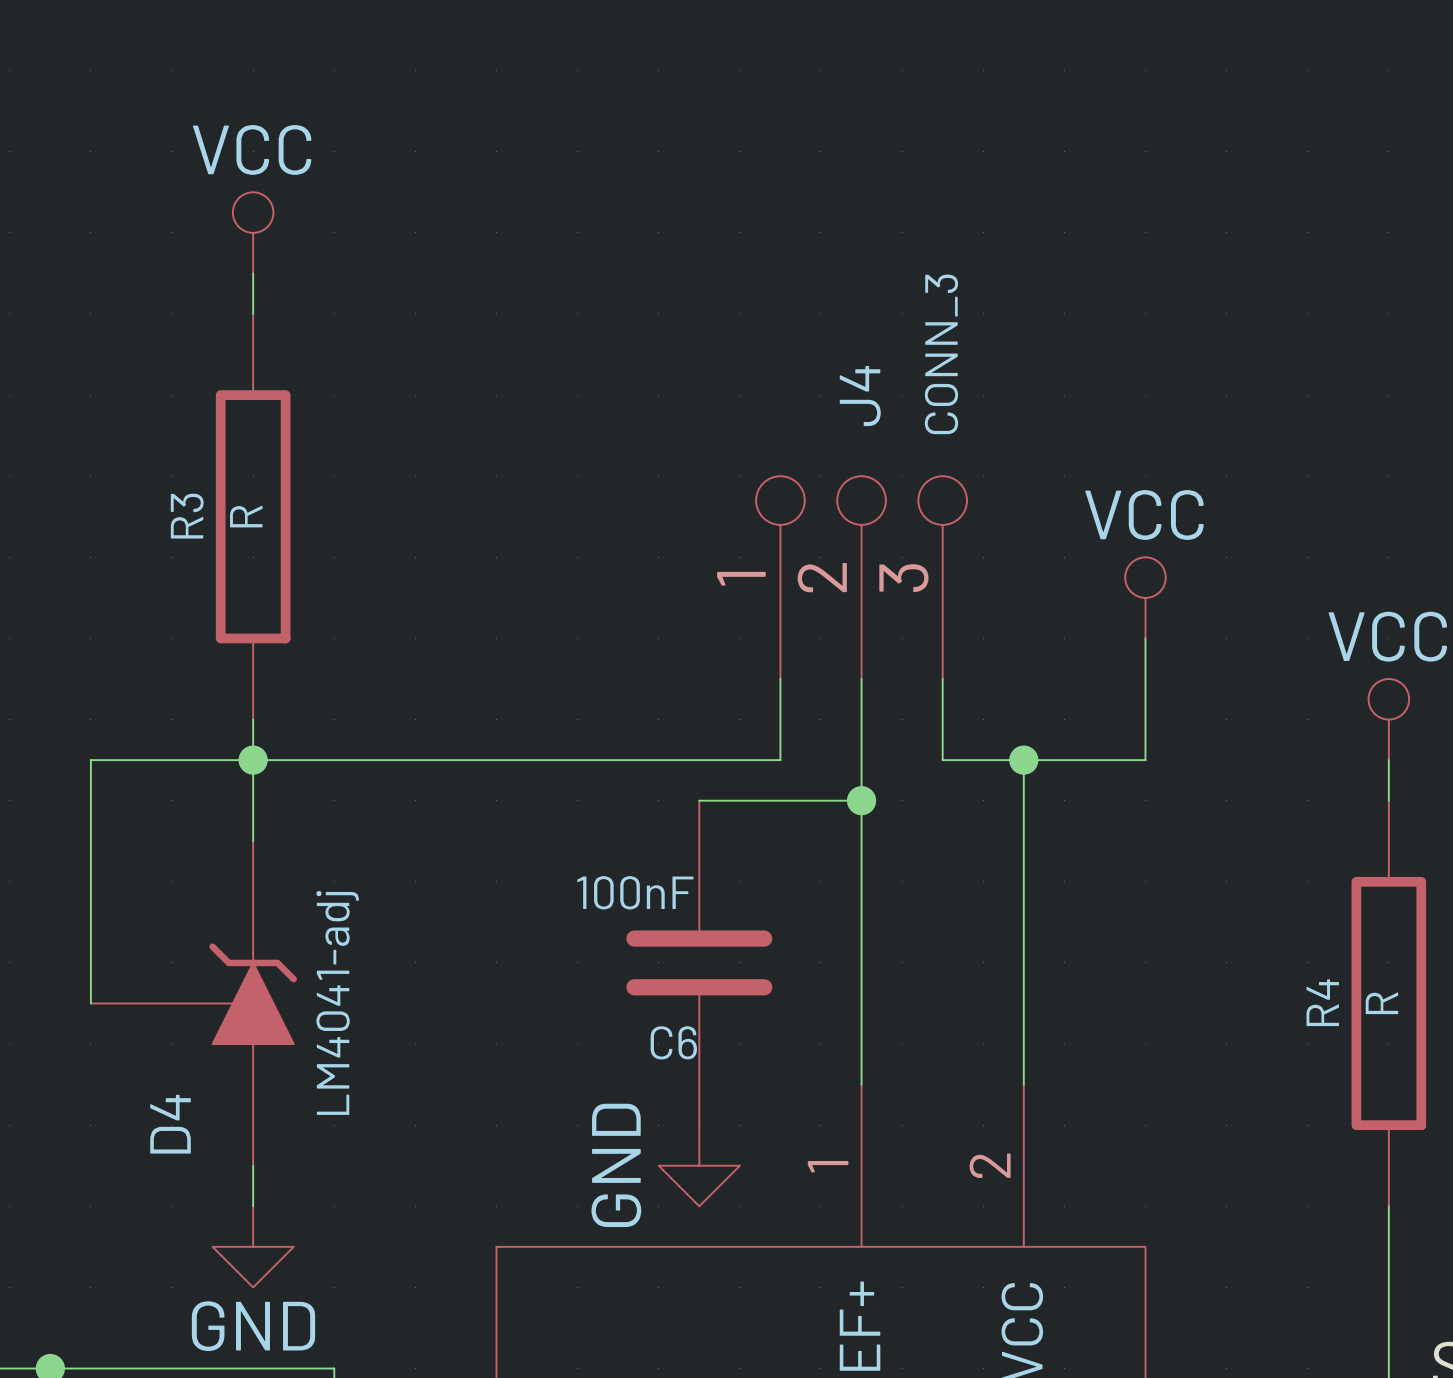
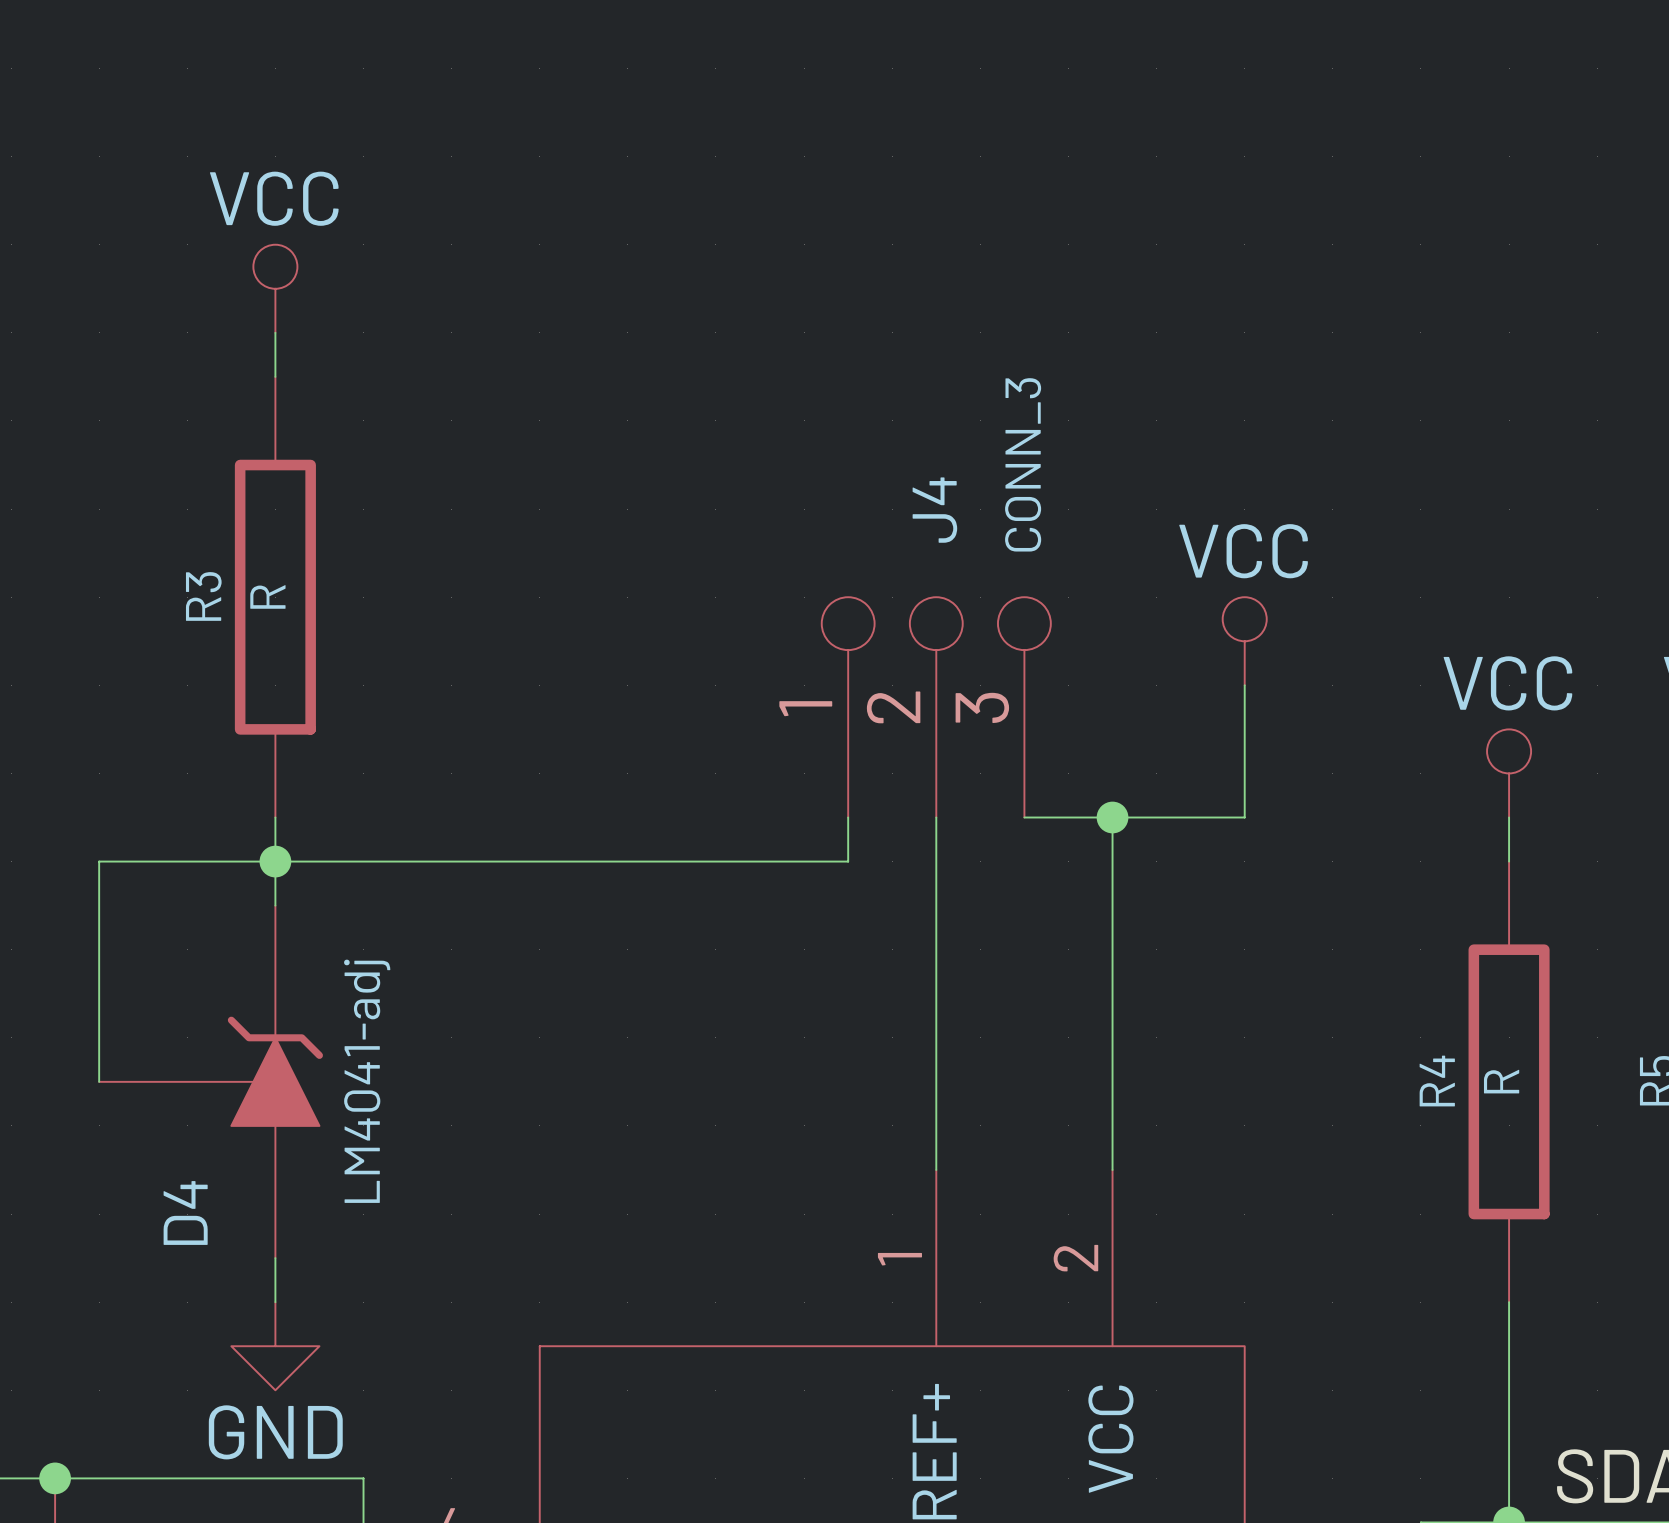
power symbol position: VCC (253, 232) -> VCC (275, 288)
R3 position: (253, 516) -> (275, 597)
J4 position: (861, 577) -> (936, 707)
wire: (780, 679) (780, 760) (90, 760) (90, 800) -> (760, 861) (99, 861)
junction position: (253, 760) -> (275, 861)
wire: (780, 800) (861, 800) -> (848, 861) (848, 817)
junction: (861, 800) -> none
C6: 100nF (699, 962) -> none
power symbol: GND (699, 1165) -> none

